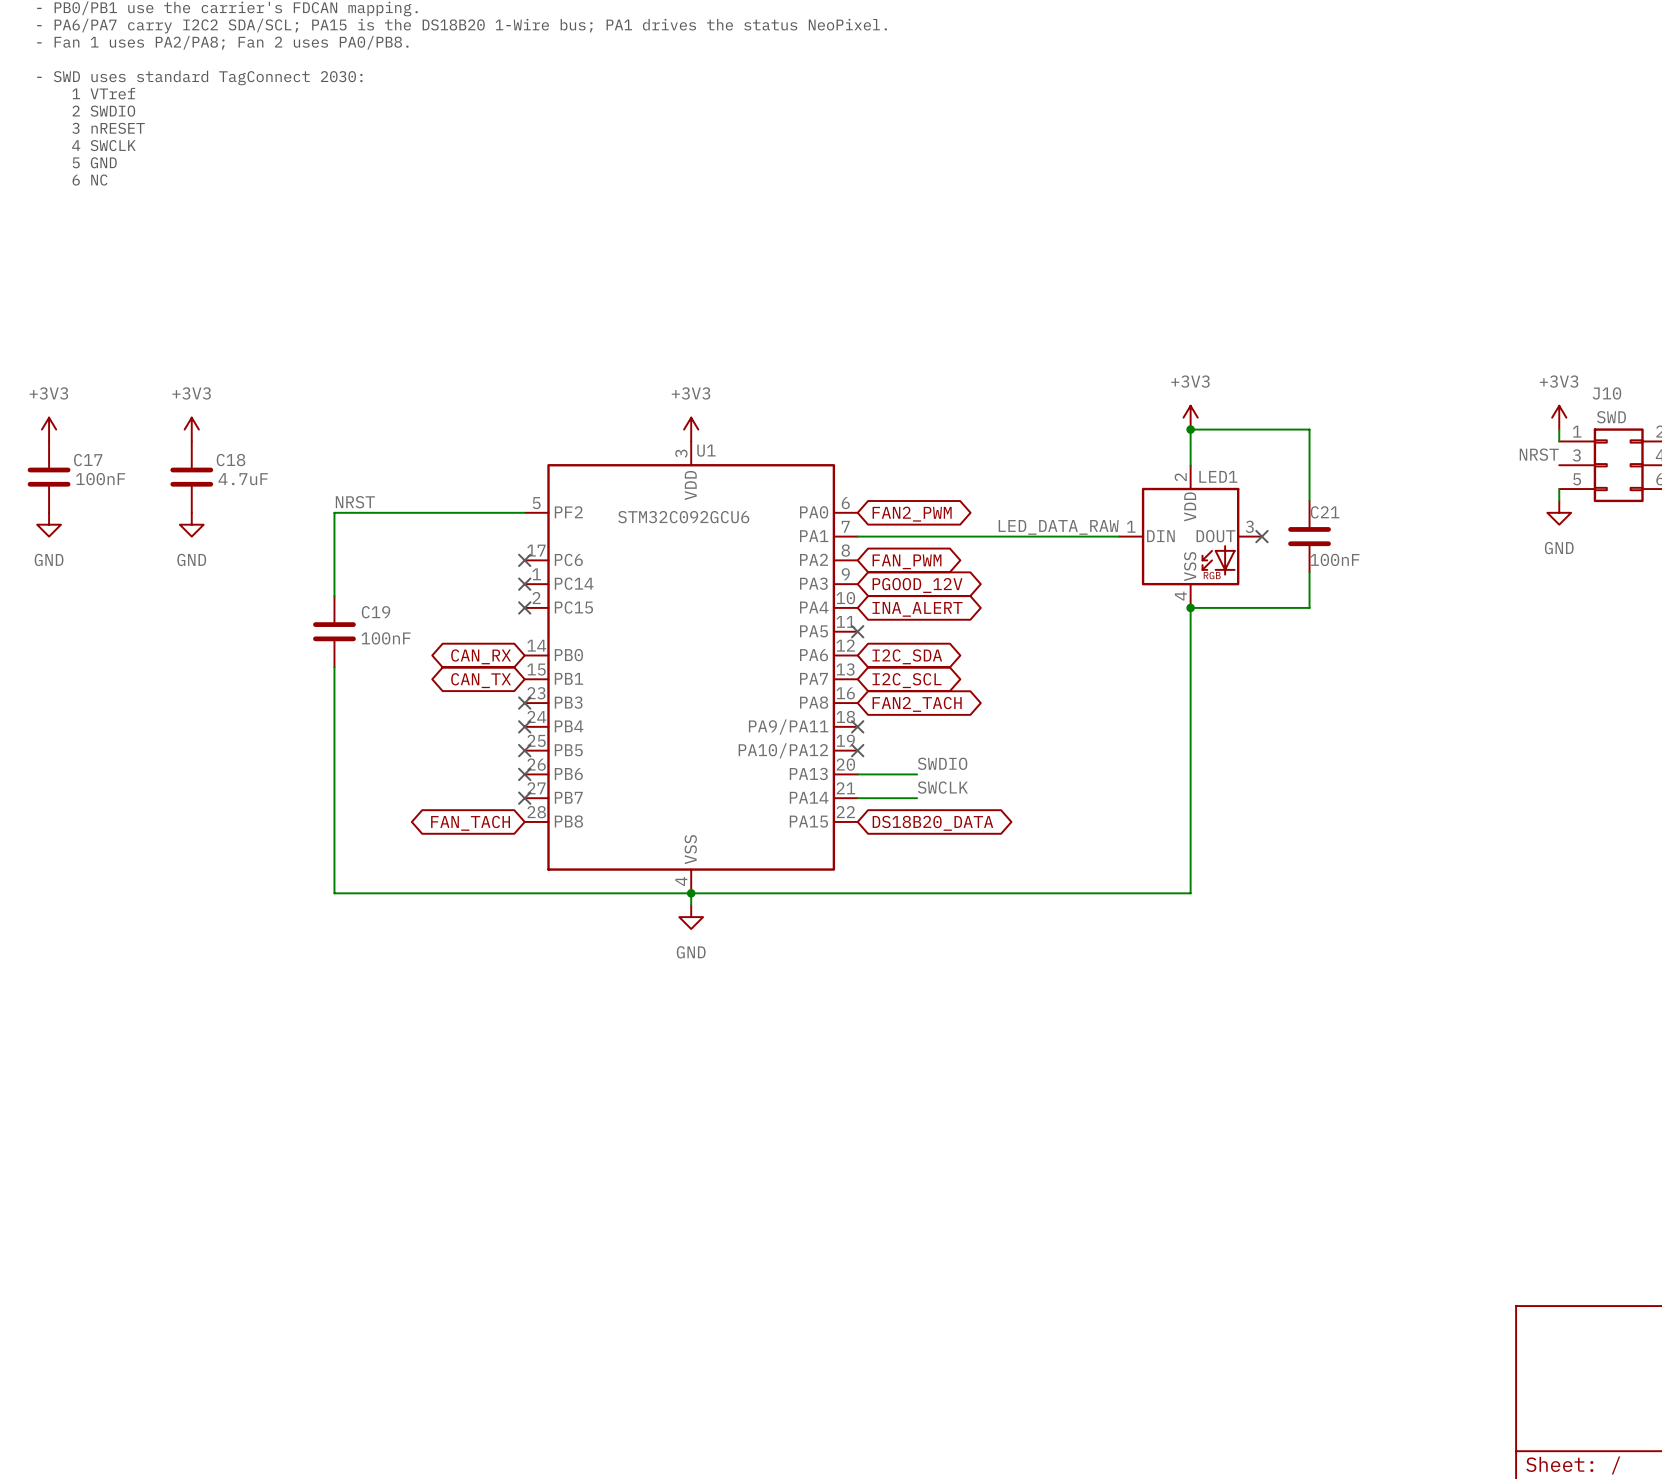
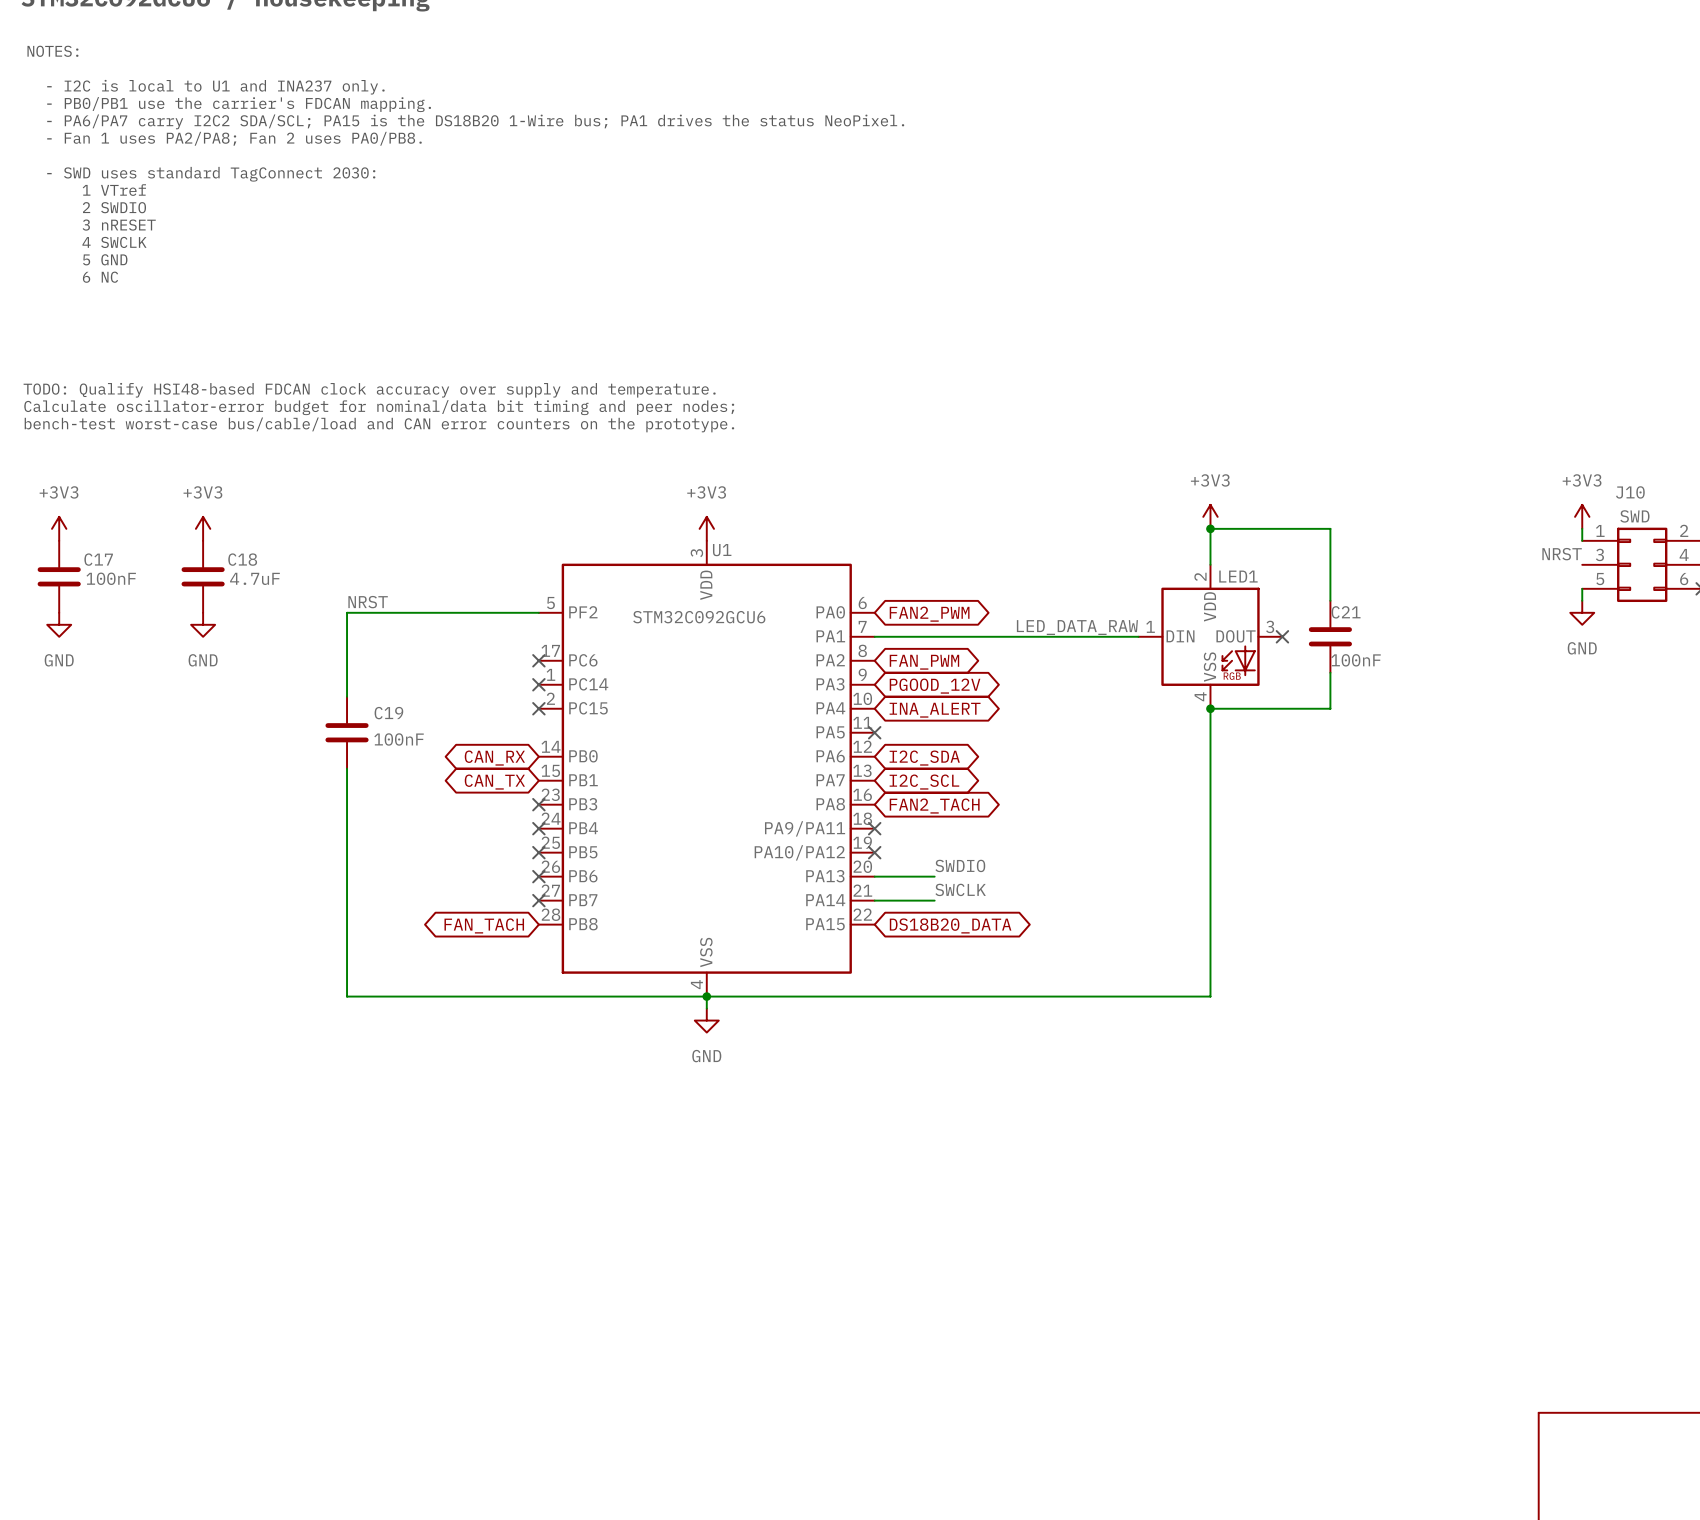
text: none -> TODO: Qualify HSI48-based FDCAN clock accuracy over supply and temperature. (369, 390)
text: none -> Calculate oscillator-error budget for nominal/data bit timing and peer nodes; (379, 407)
text: none -> bench-test worst-case bus/cable/load and CAN error counters on the prototype. (379, 424)

